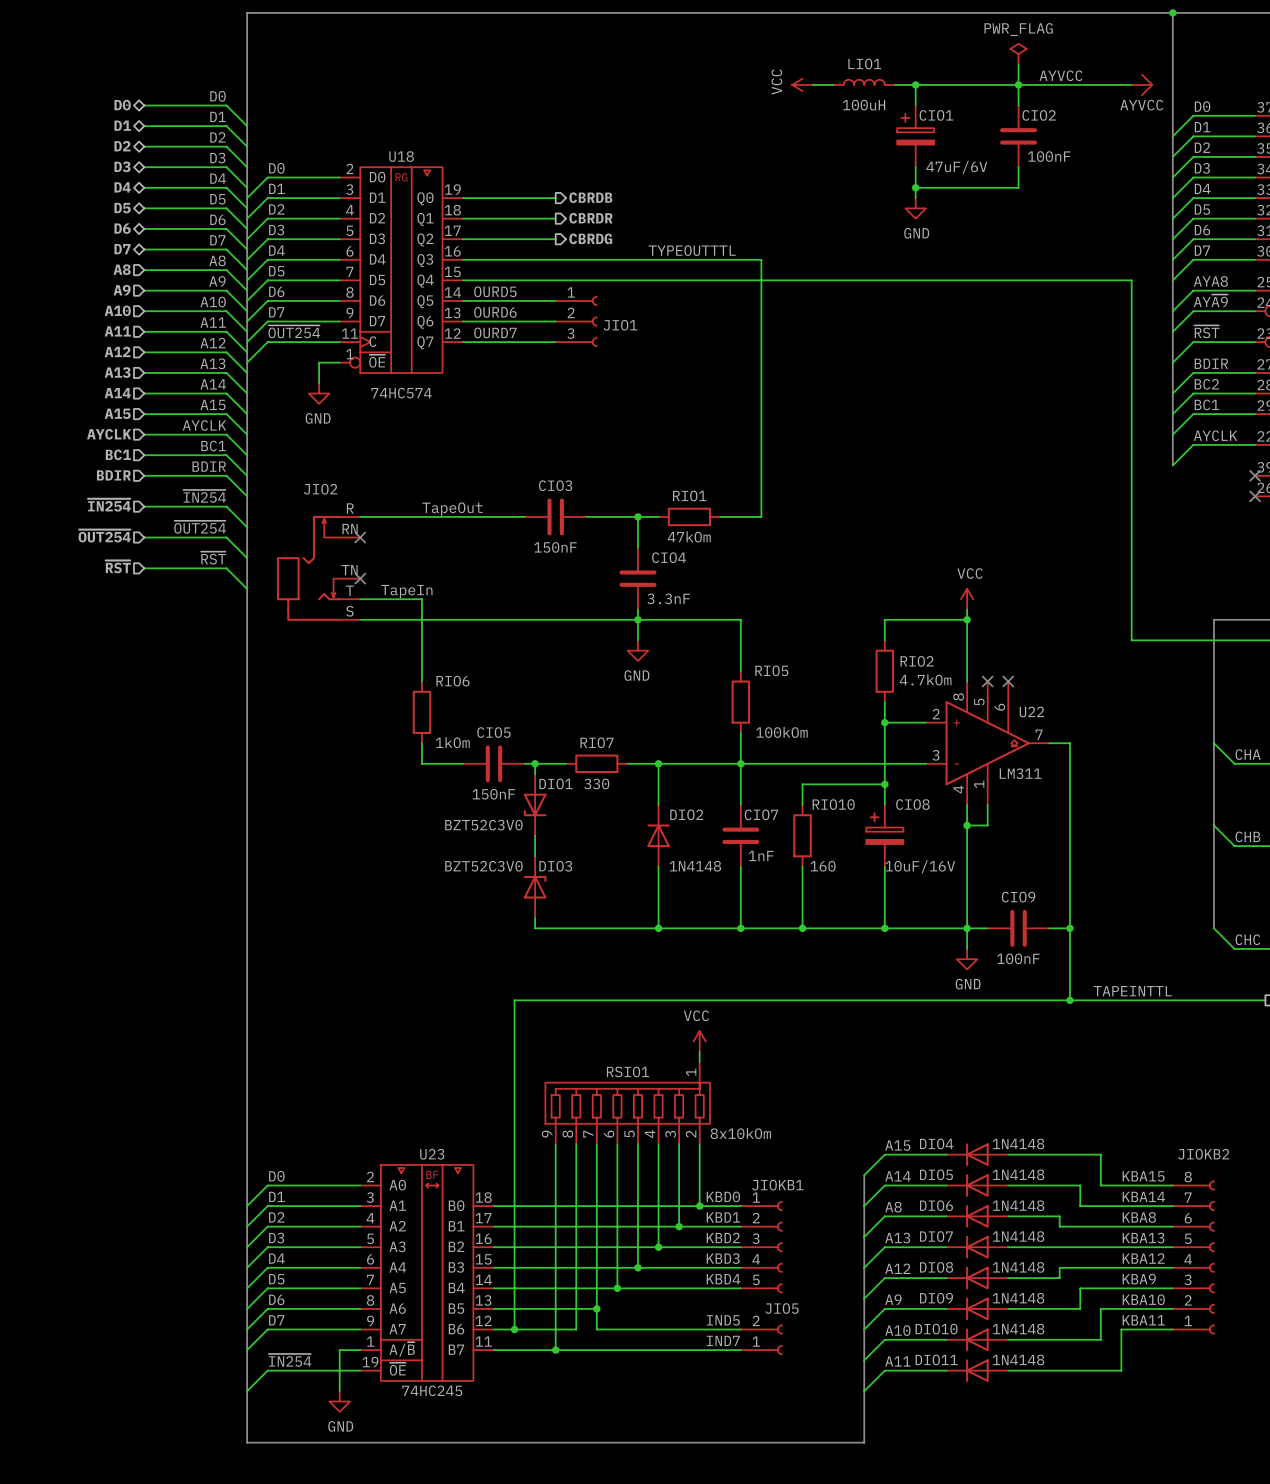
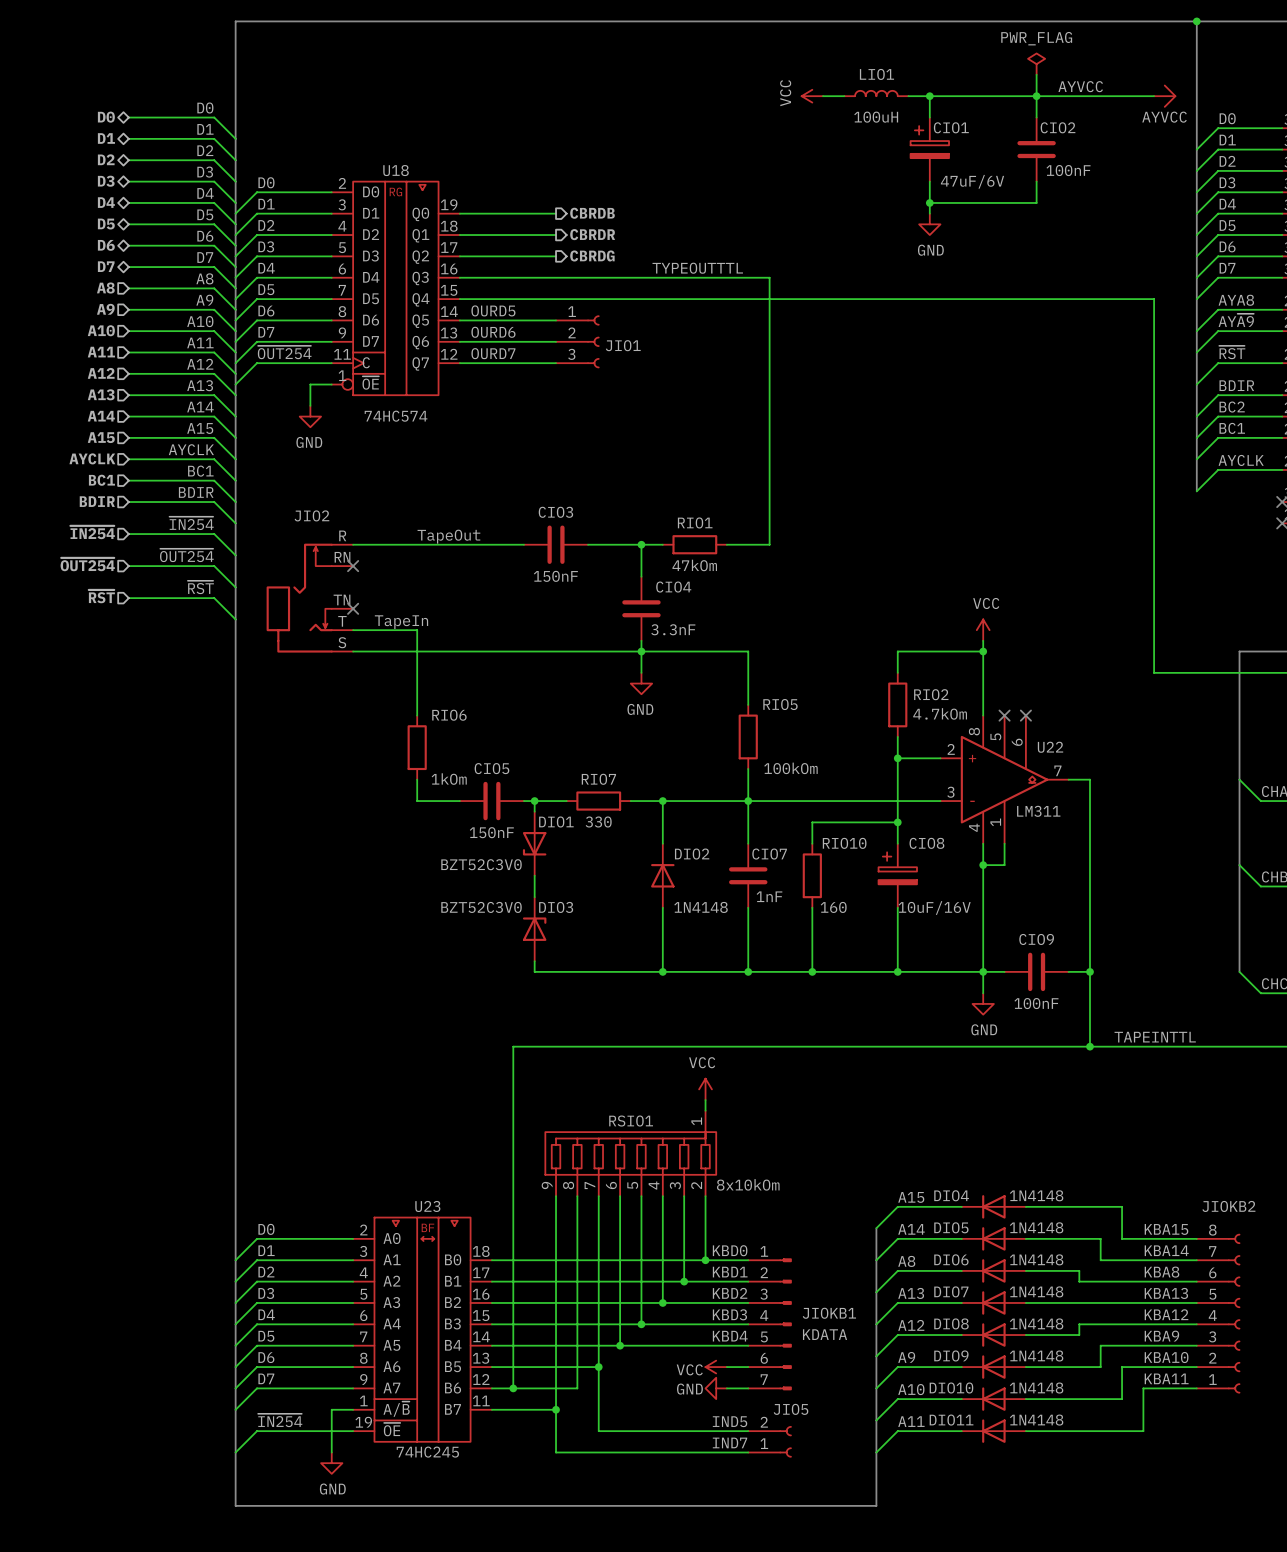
JIOKB1 name position: JIOKB1 (777, 1185) -> JIOKB1 (829, 1313)
JIOKB1 symbol: [740, 1201, 783, 1294] -> [748, 1258, 792, 1391]
JIOKB1 value: none -> KDATA (825, 1334)
power symbol: none -> VCC (716, 1367)
wire: none -> (726, 1367) (748, 1367)
label position: IND5 (723, 1320) -> IND5 (730, 1421)
wire: (596, 1329) (720, 1329) -> (598, 1388) (598, 1431) (748, 1431)
power symbol: none -> GND (716, 1388)
JIO5 position: (761, 1339) -> (769, 1441)
label position: IND7 (723, 1340) -> IND7 (730, 1442)
wire: (555, 1350) (740, 1350) -> (556, 1409) (556, 1452) (748, 1452)

